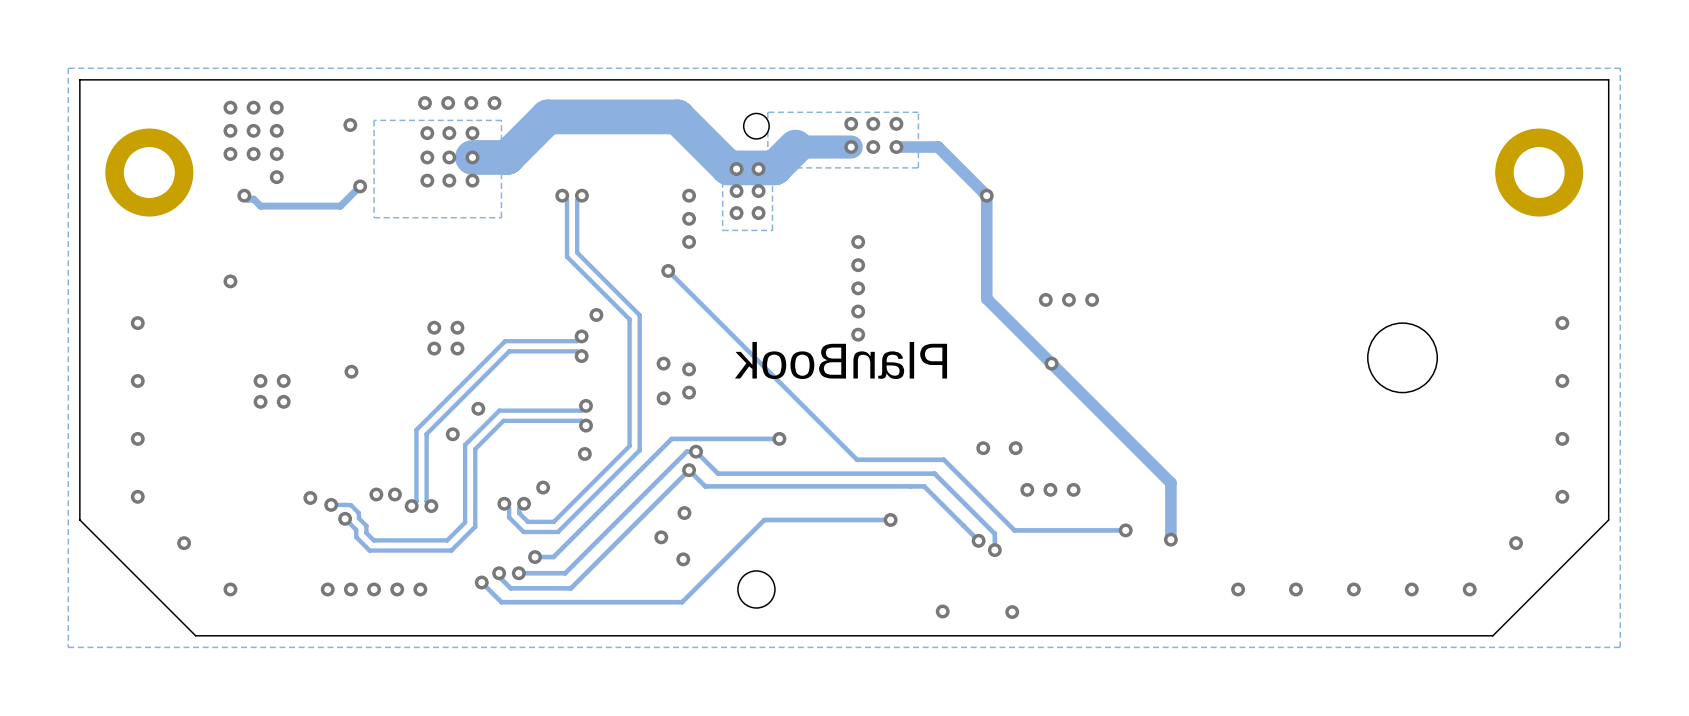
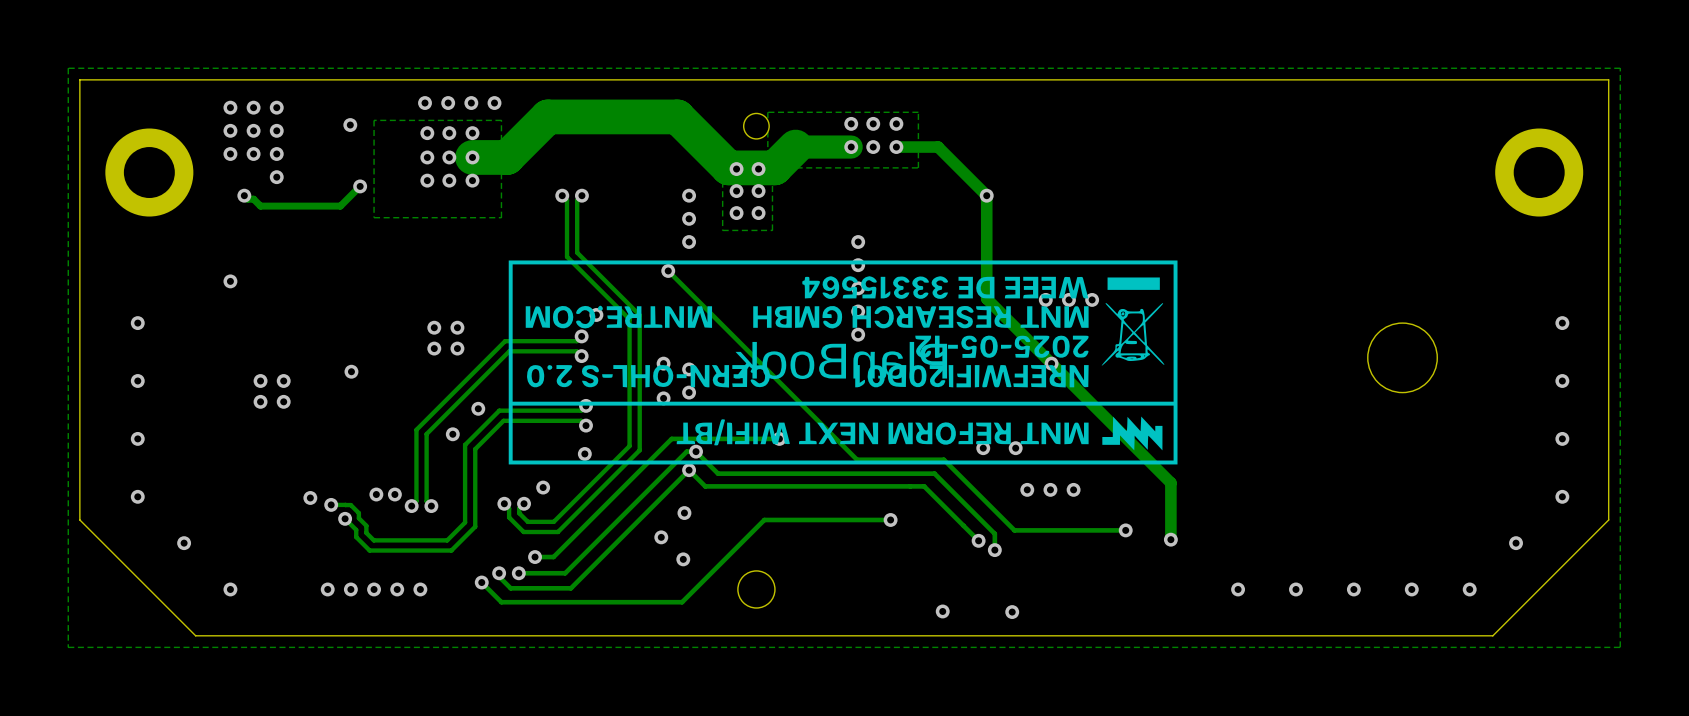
drawing: none -> [508, 260, 1178, 465]

